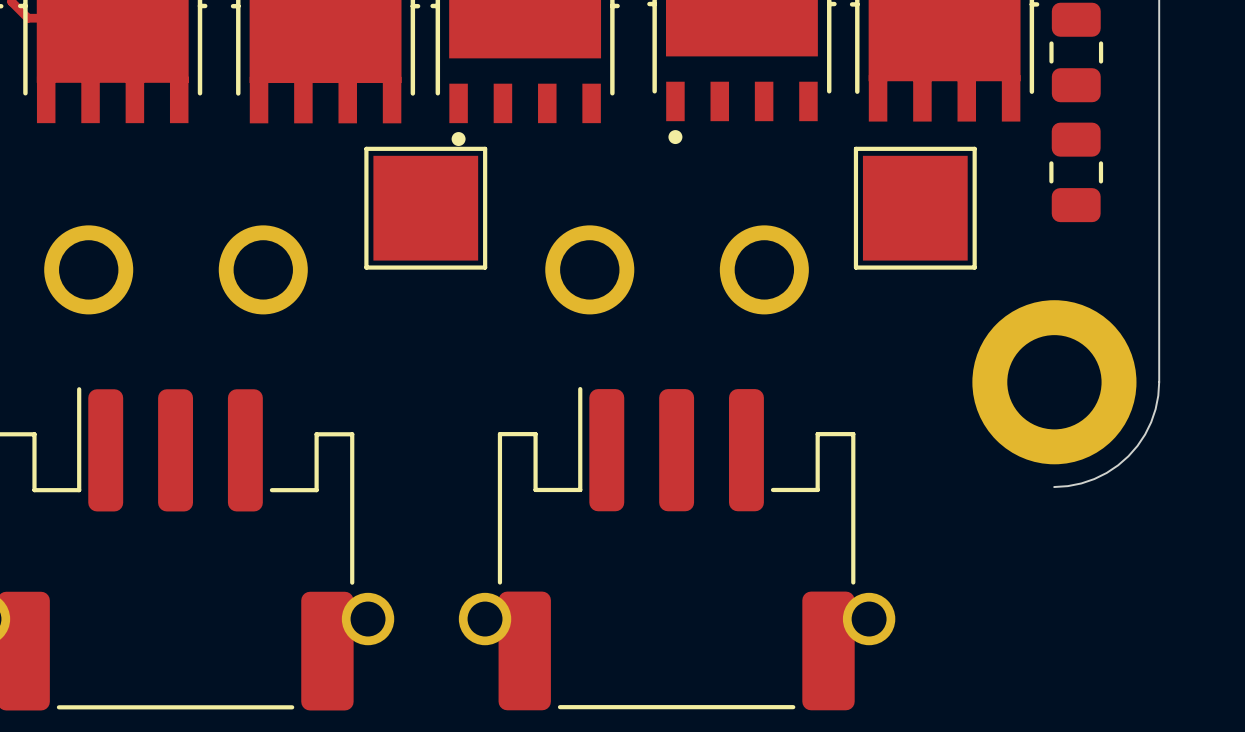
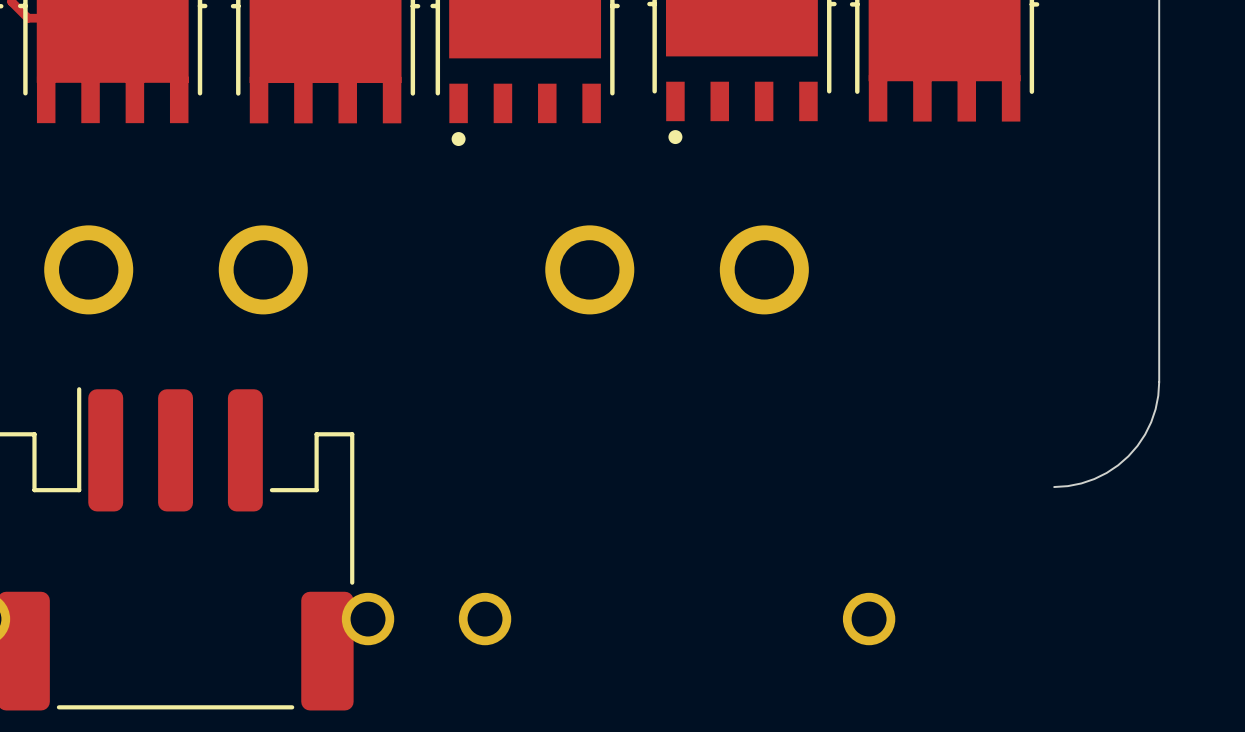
part: (1076, 52) -> none
part: (1076, 172) -> none
part: (425, 208) -> none
part: (915, 208) -> none
part: (1054, 382) -> none
part: (676, 548) -> none

